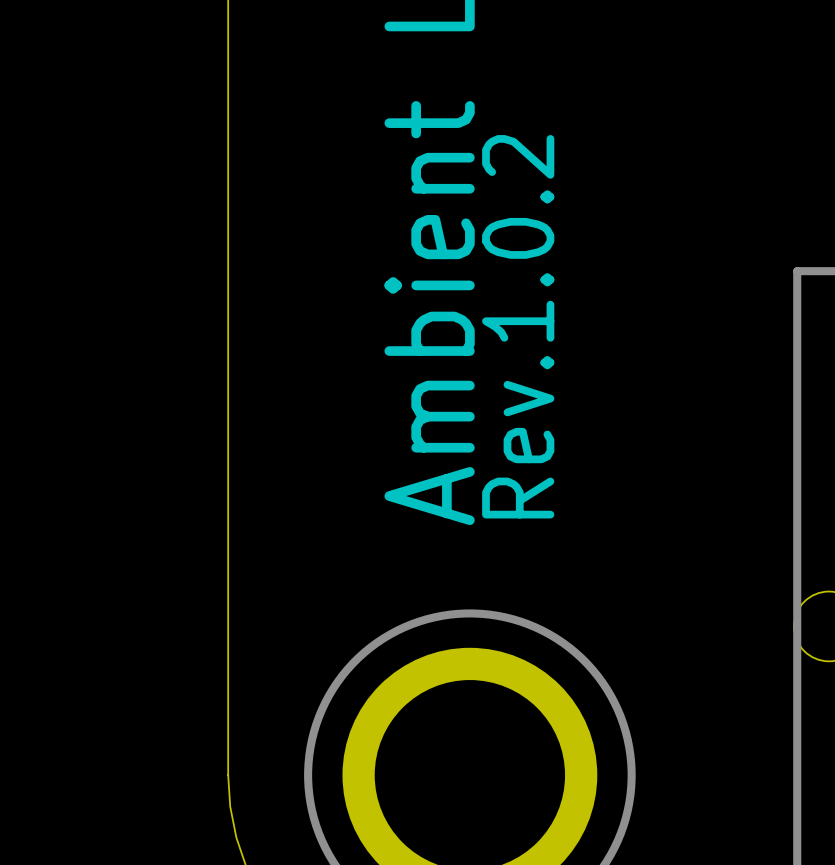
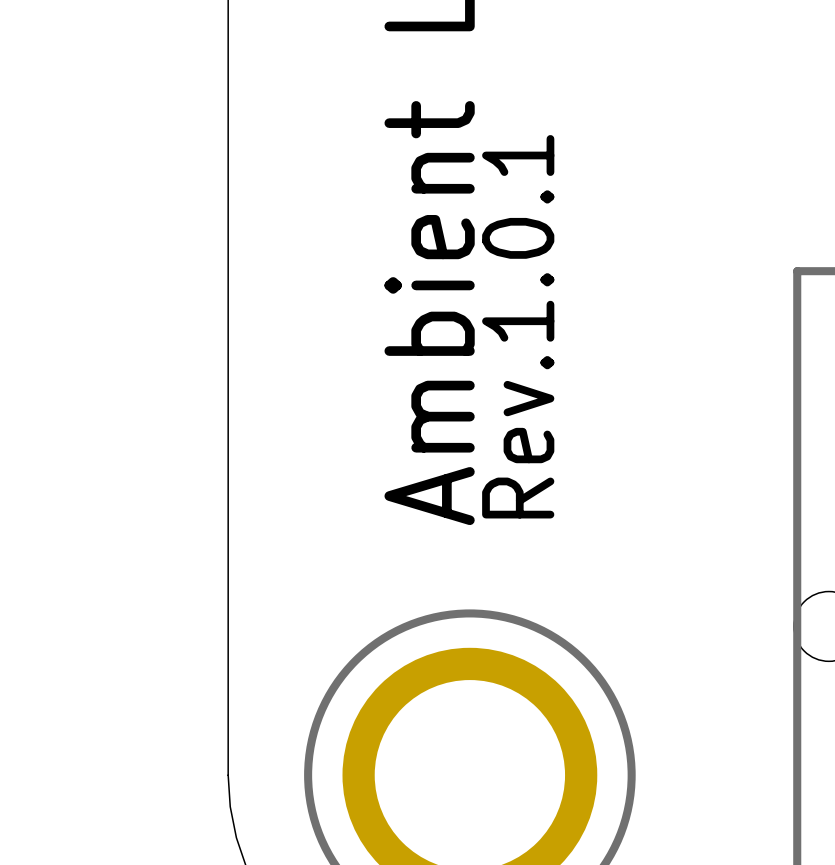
text: Rev.1.0.2 (518, 326) -> Rev.1.0.1 (518, 326)

